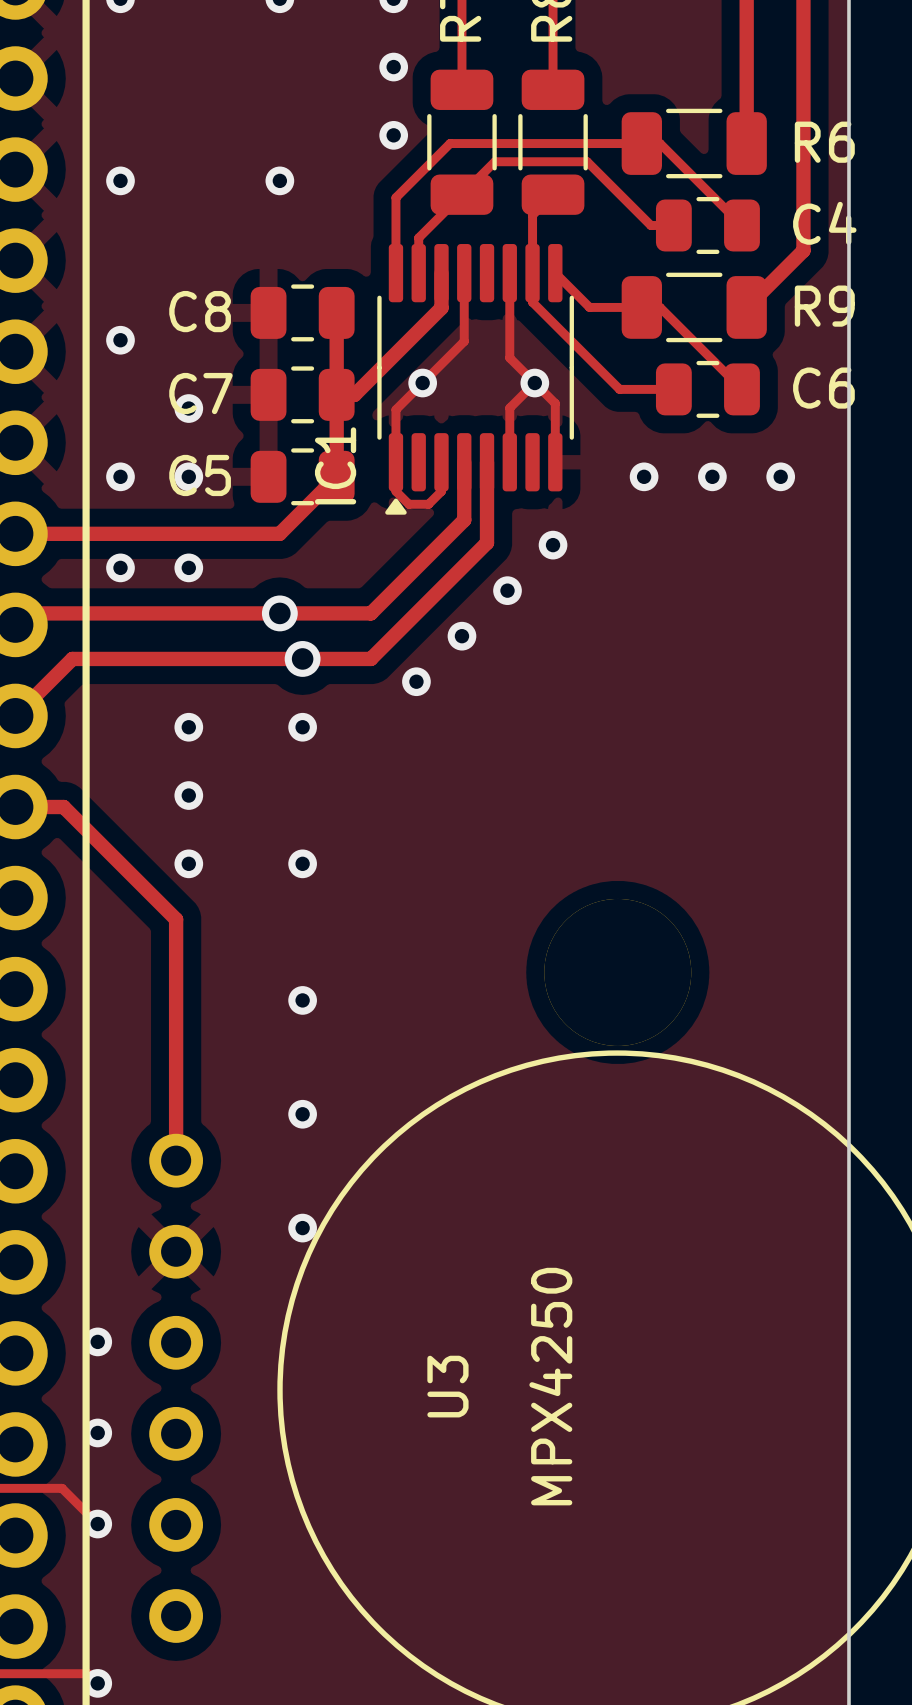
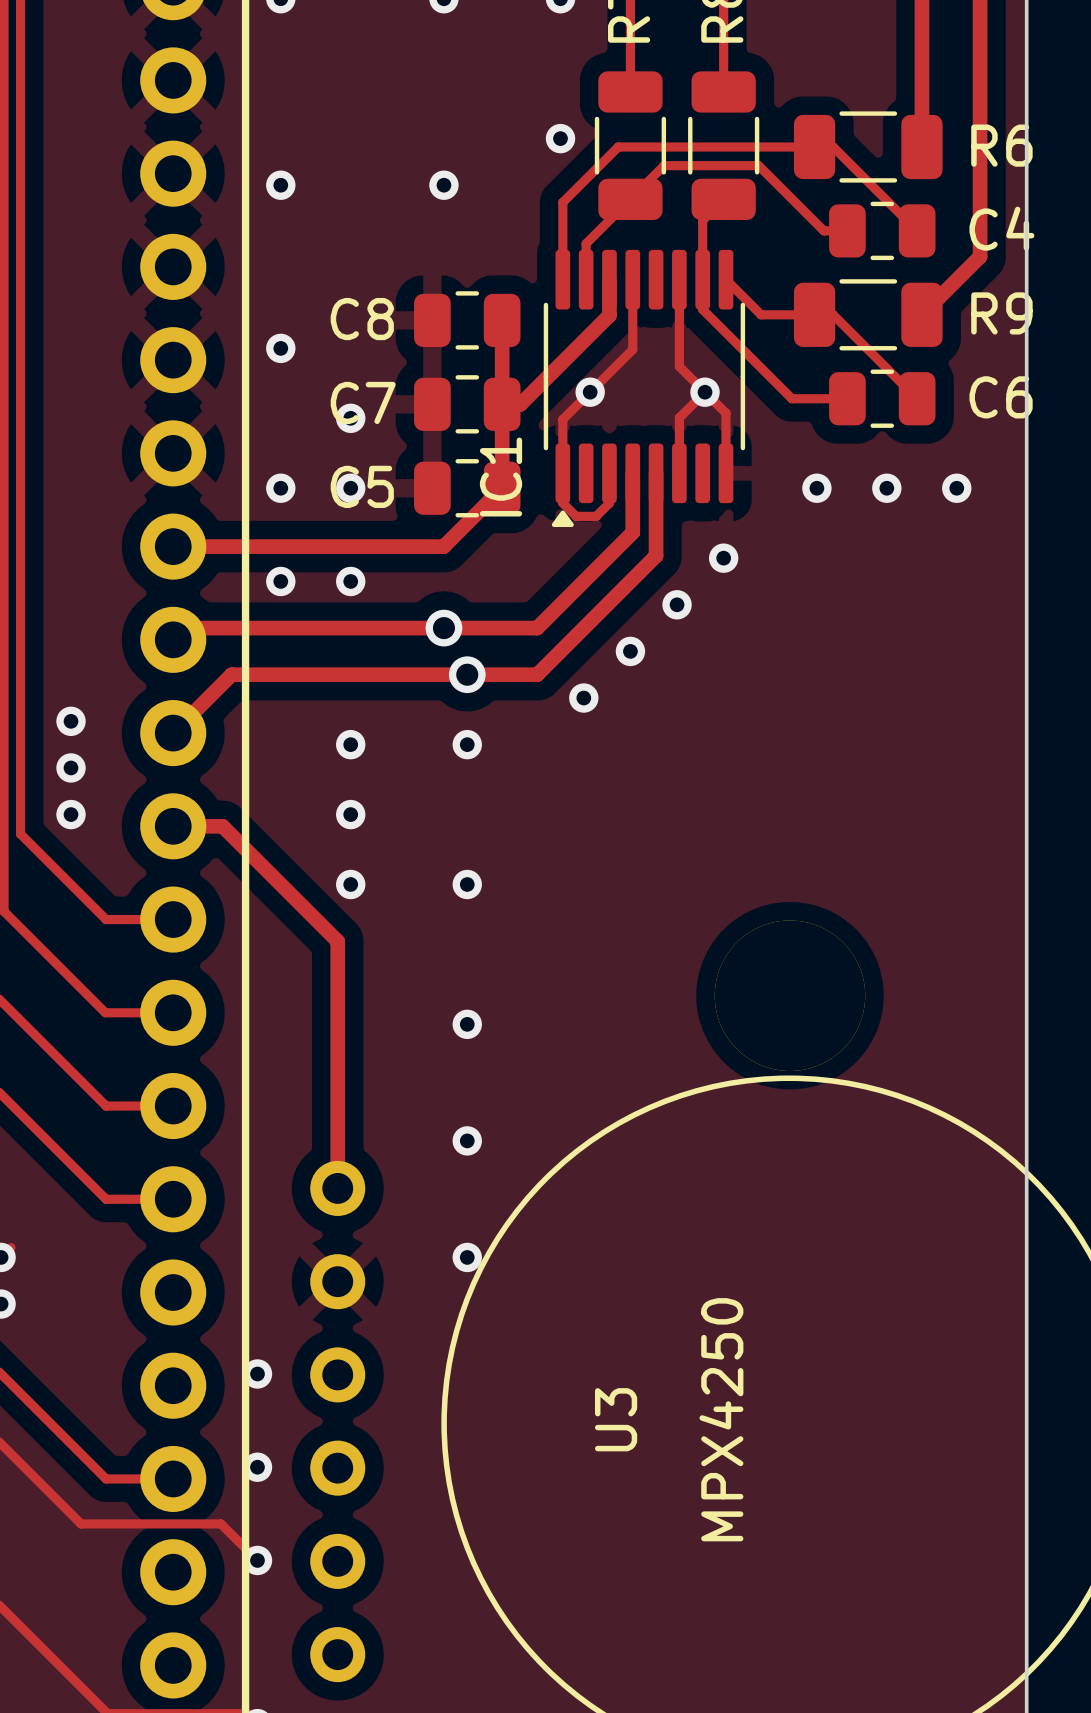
via: (393, 67) -> none

